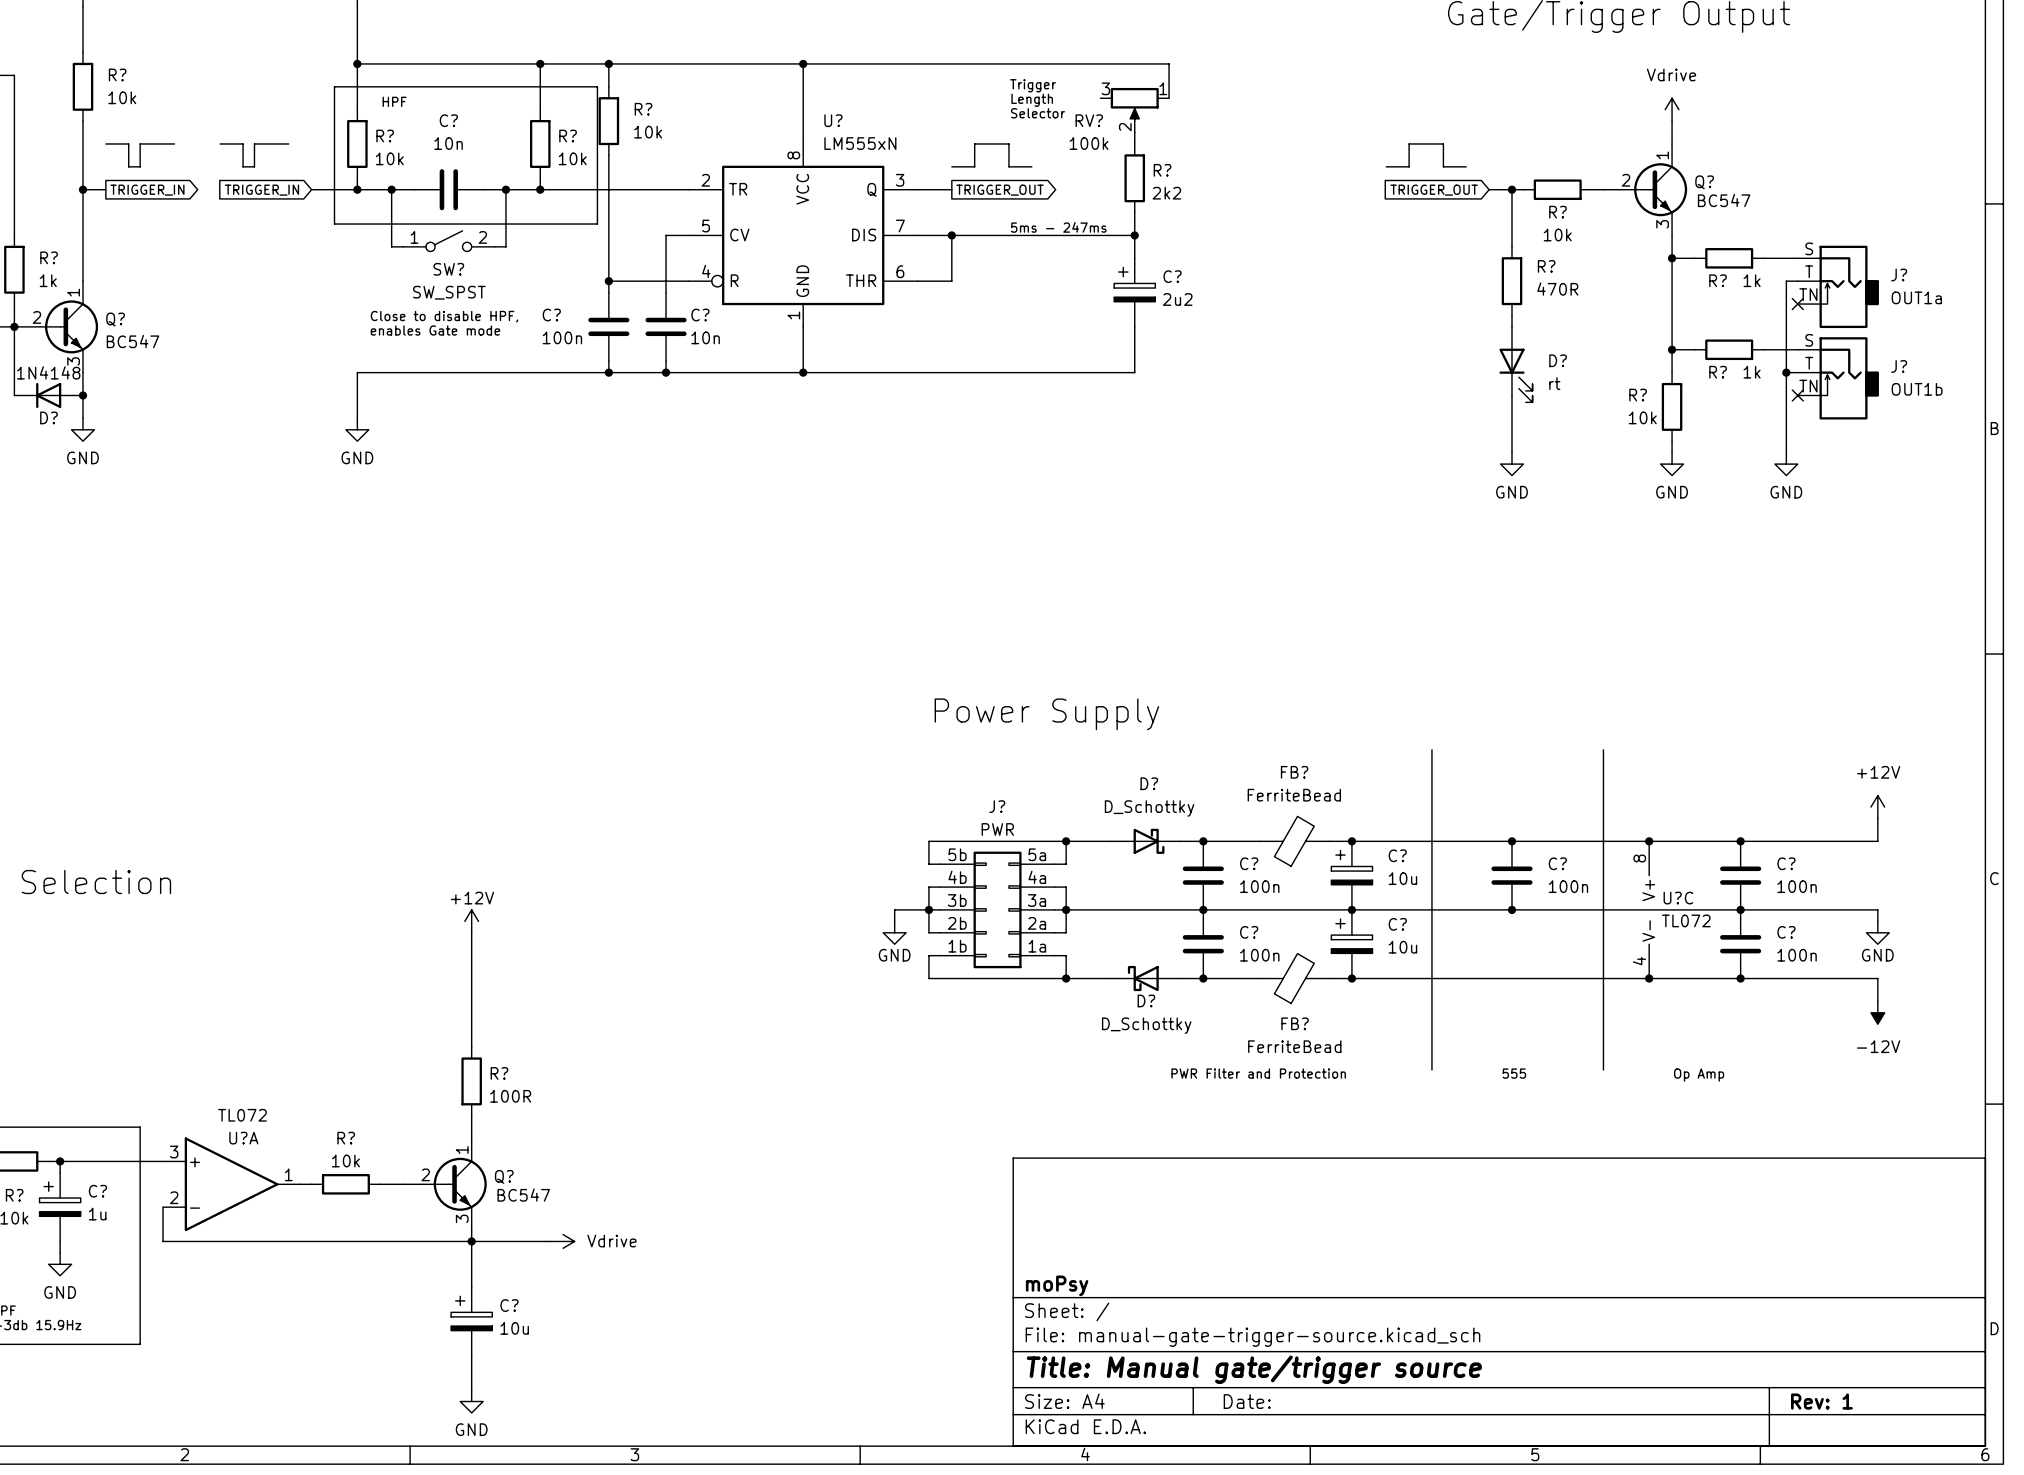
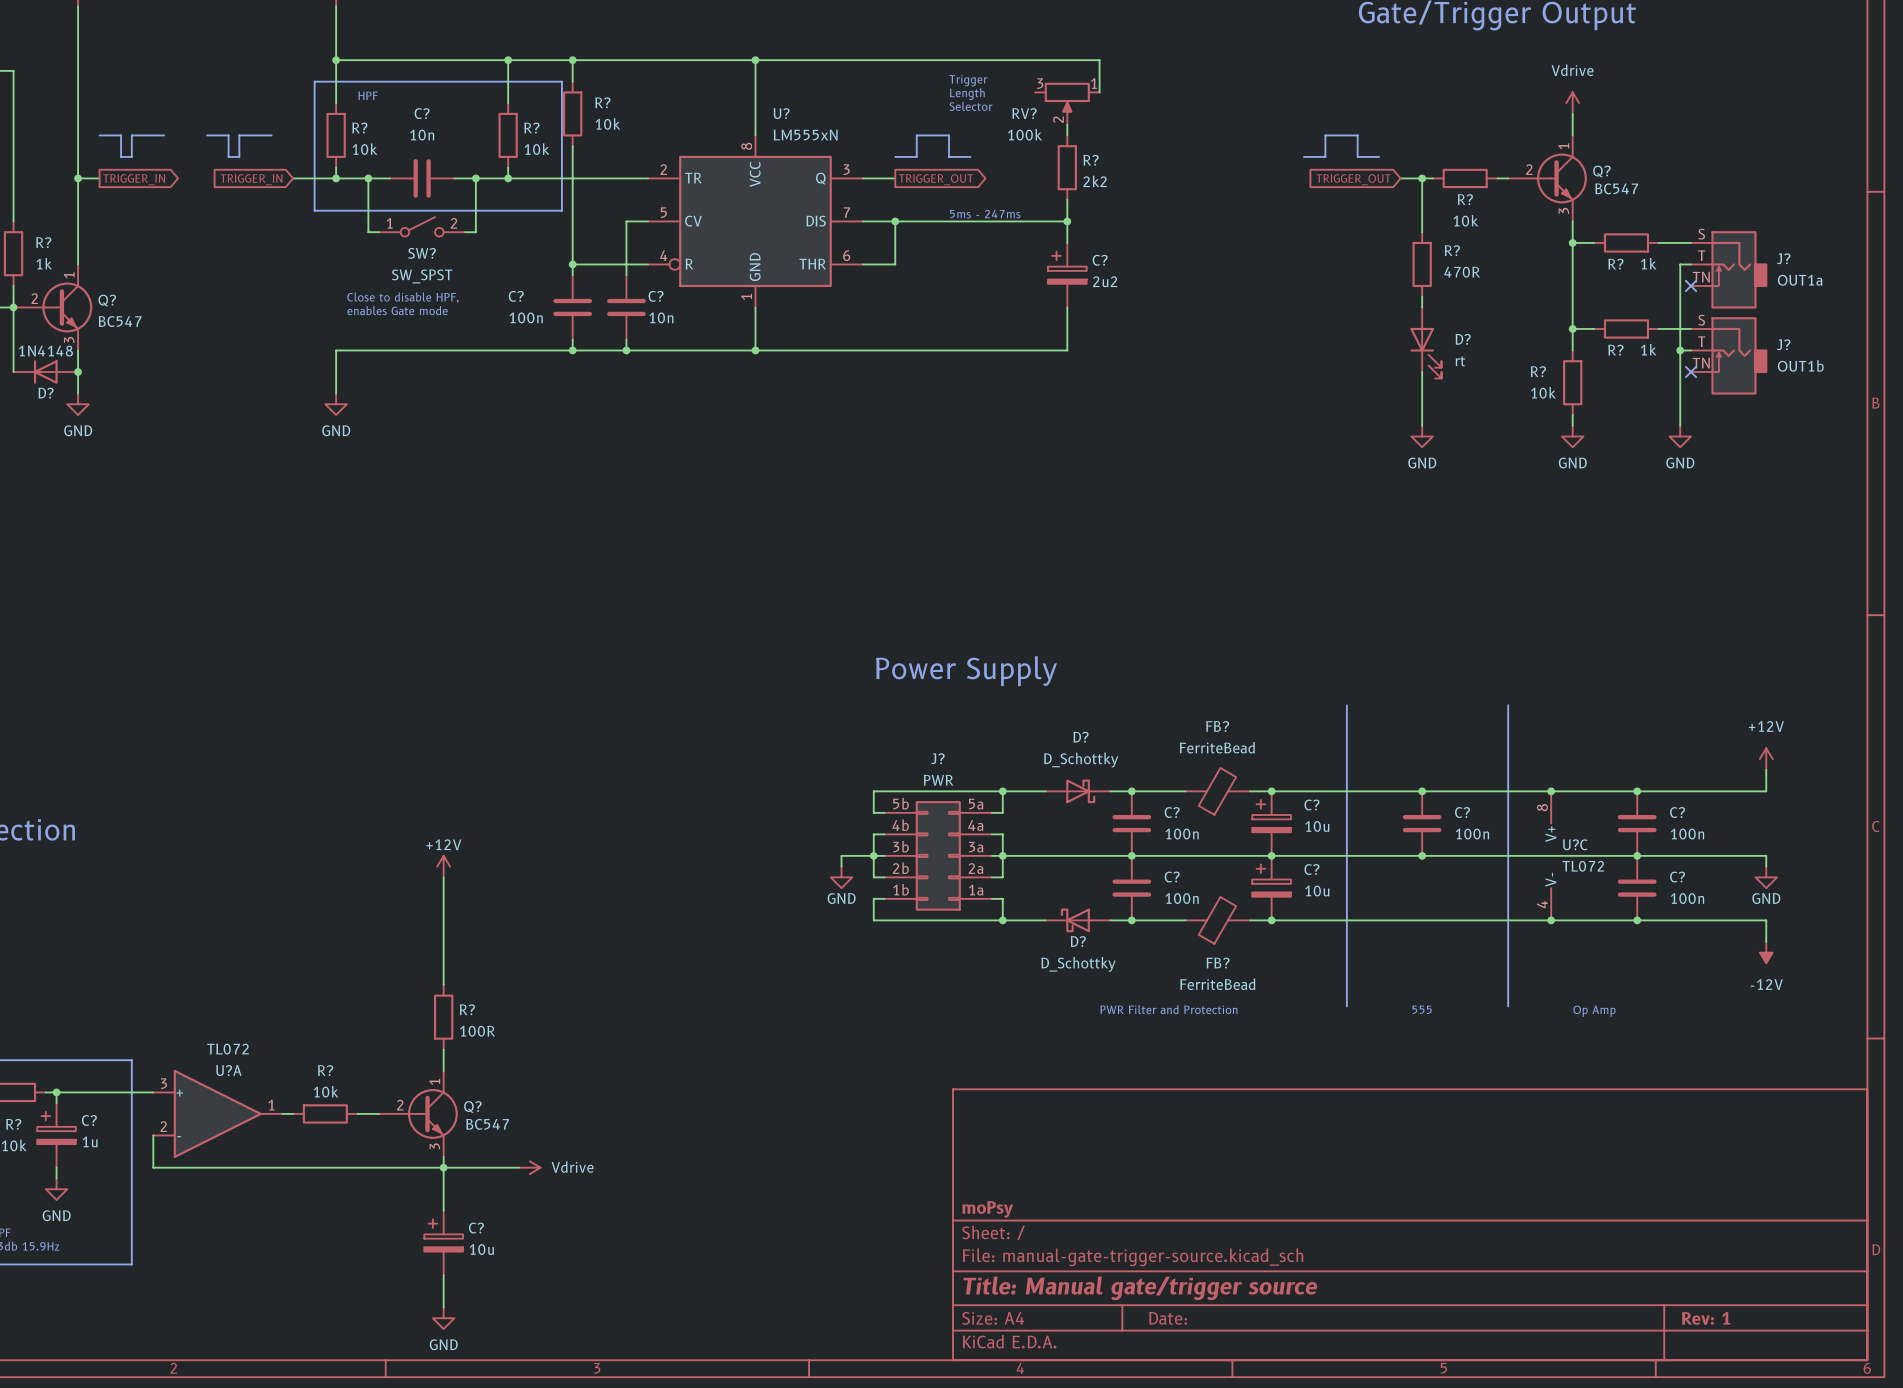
wire: none -> (78, 49) (78, 113)
R?: 10k (82, 86) -> none

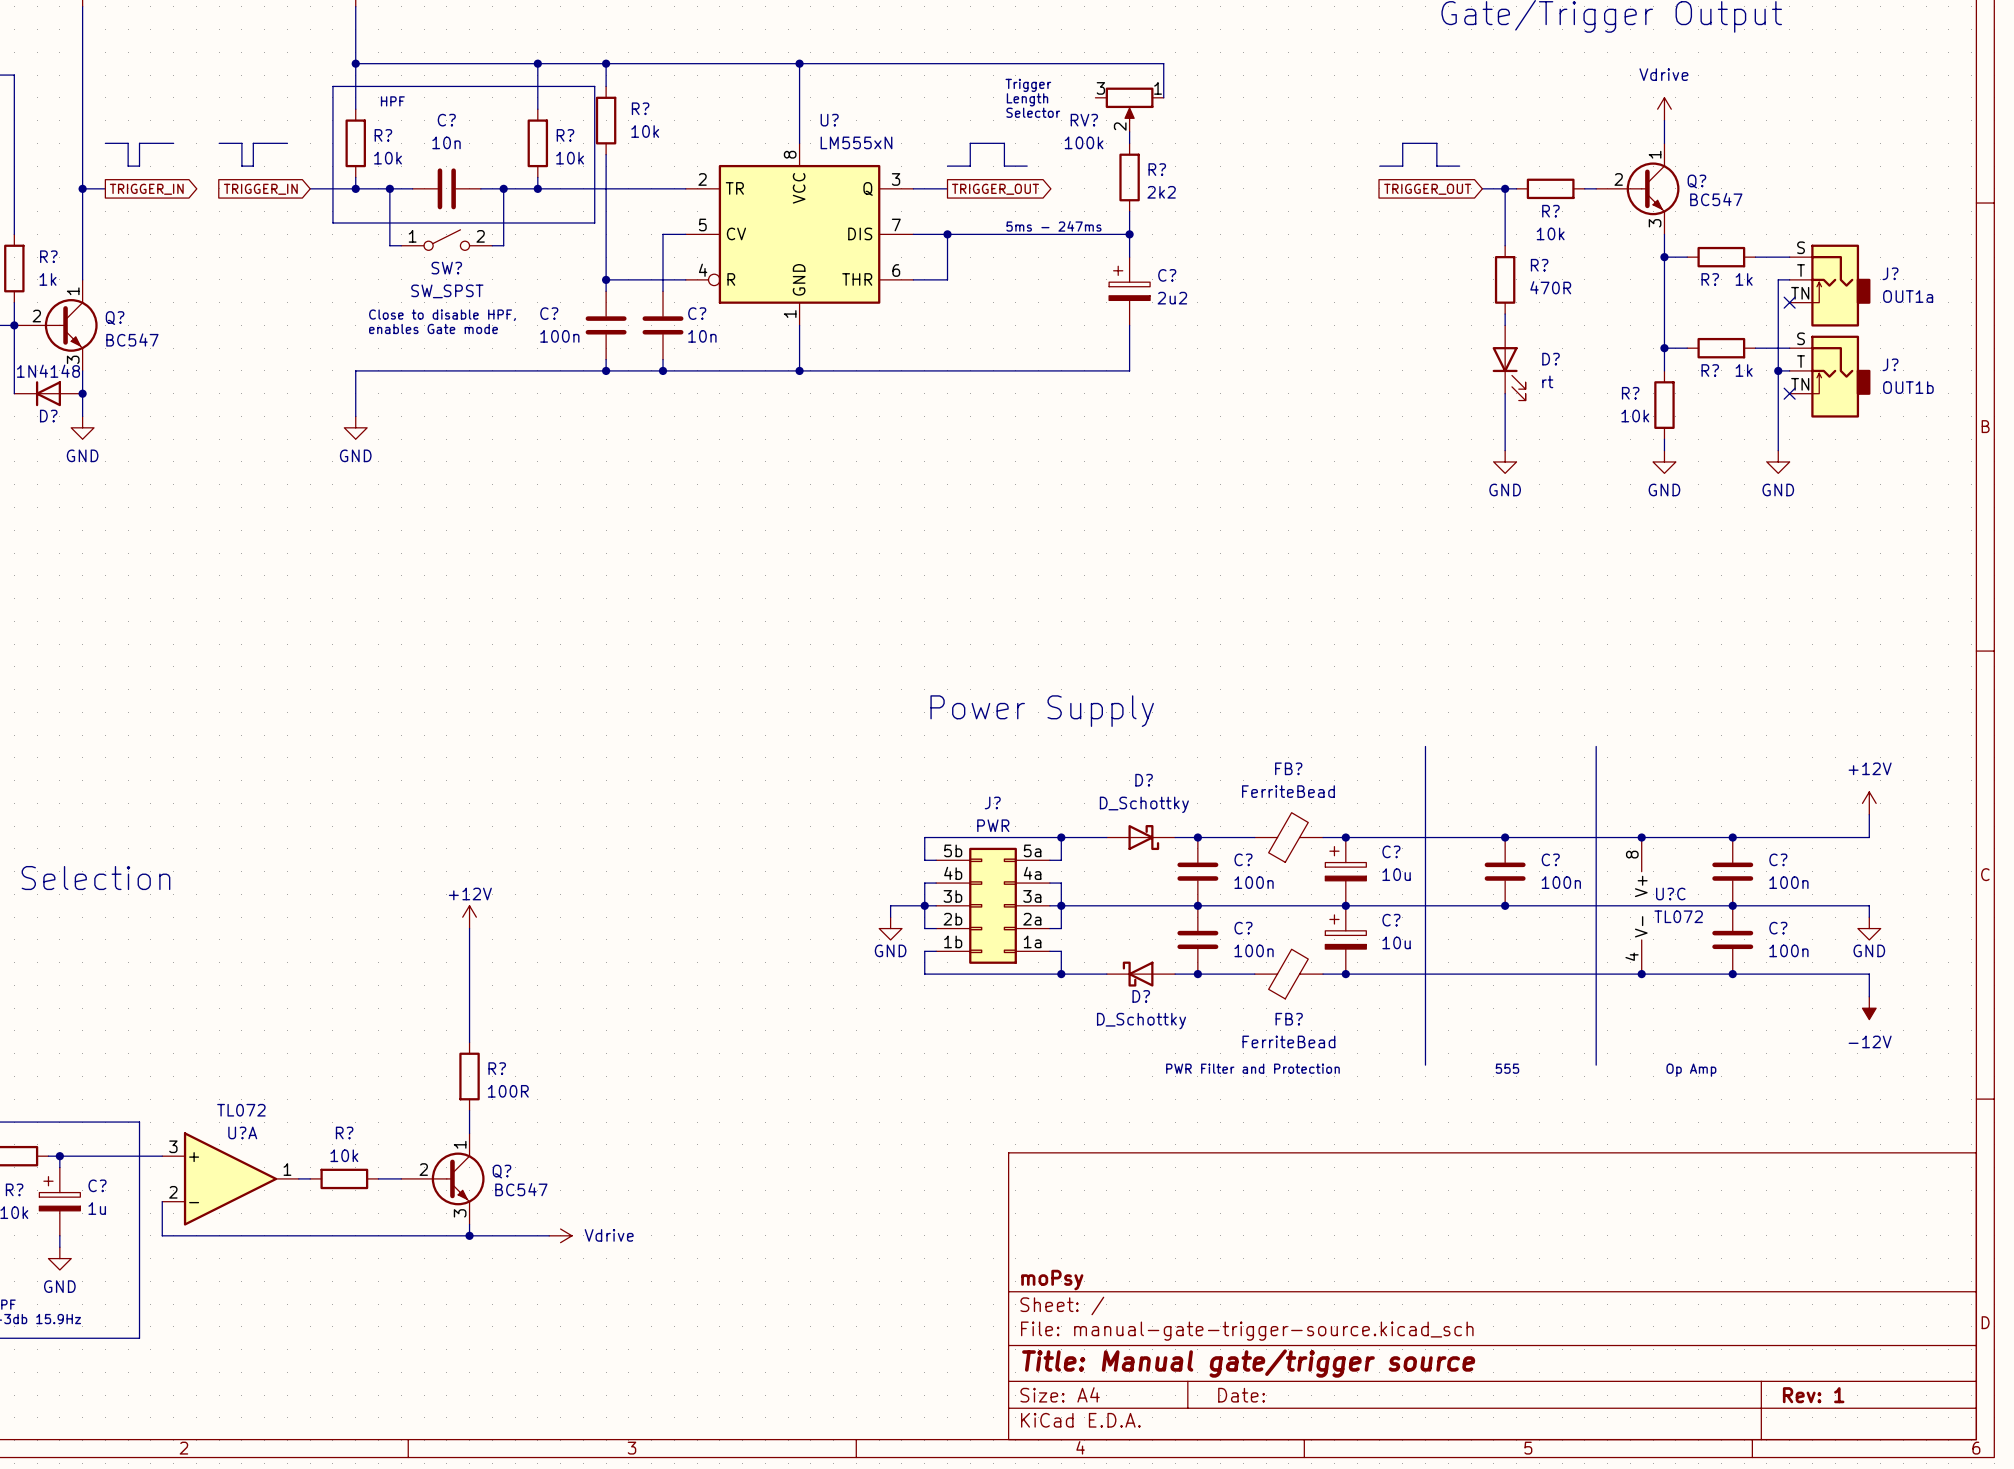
wire: (443, 1167) (443, 1210) -> none
C?: 10u (443, 1242) -> none
wire: (443, 1275) (443, 1307) -> none
power symbol: GND (443, 1318) -> none

